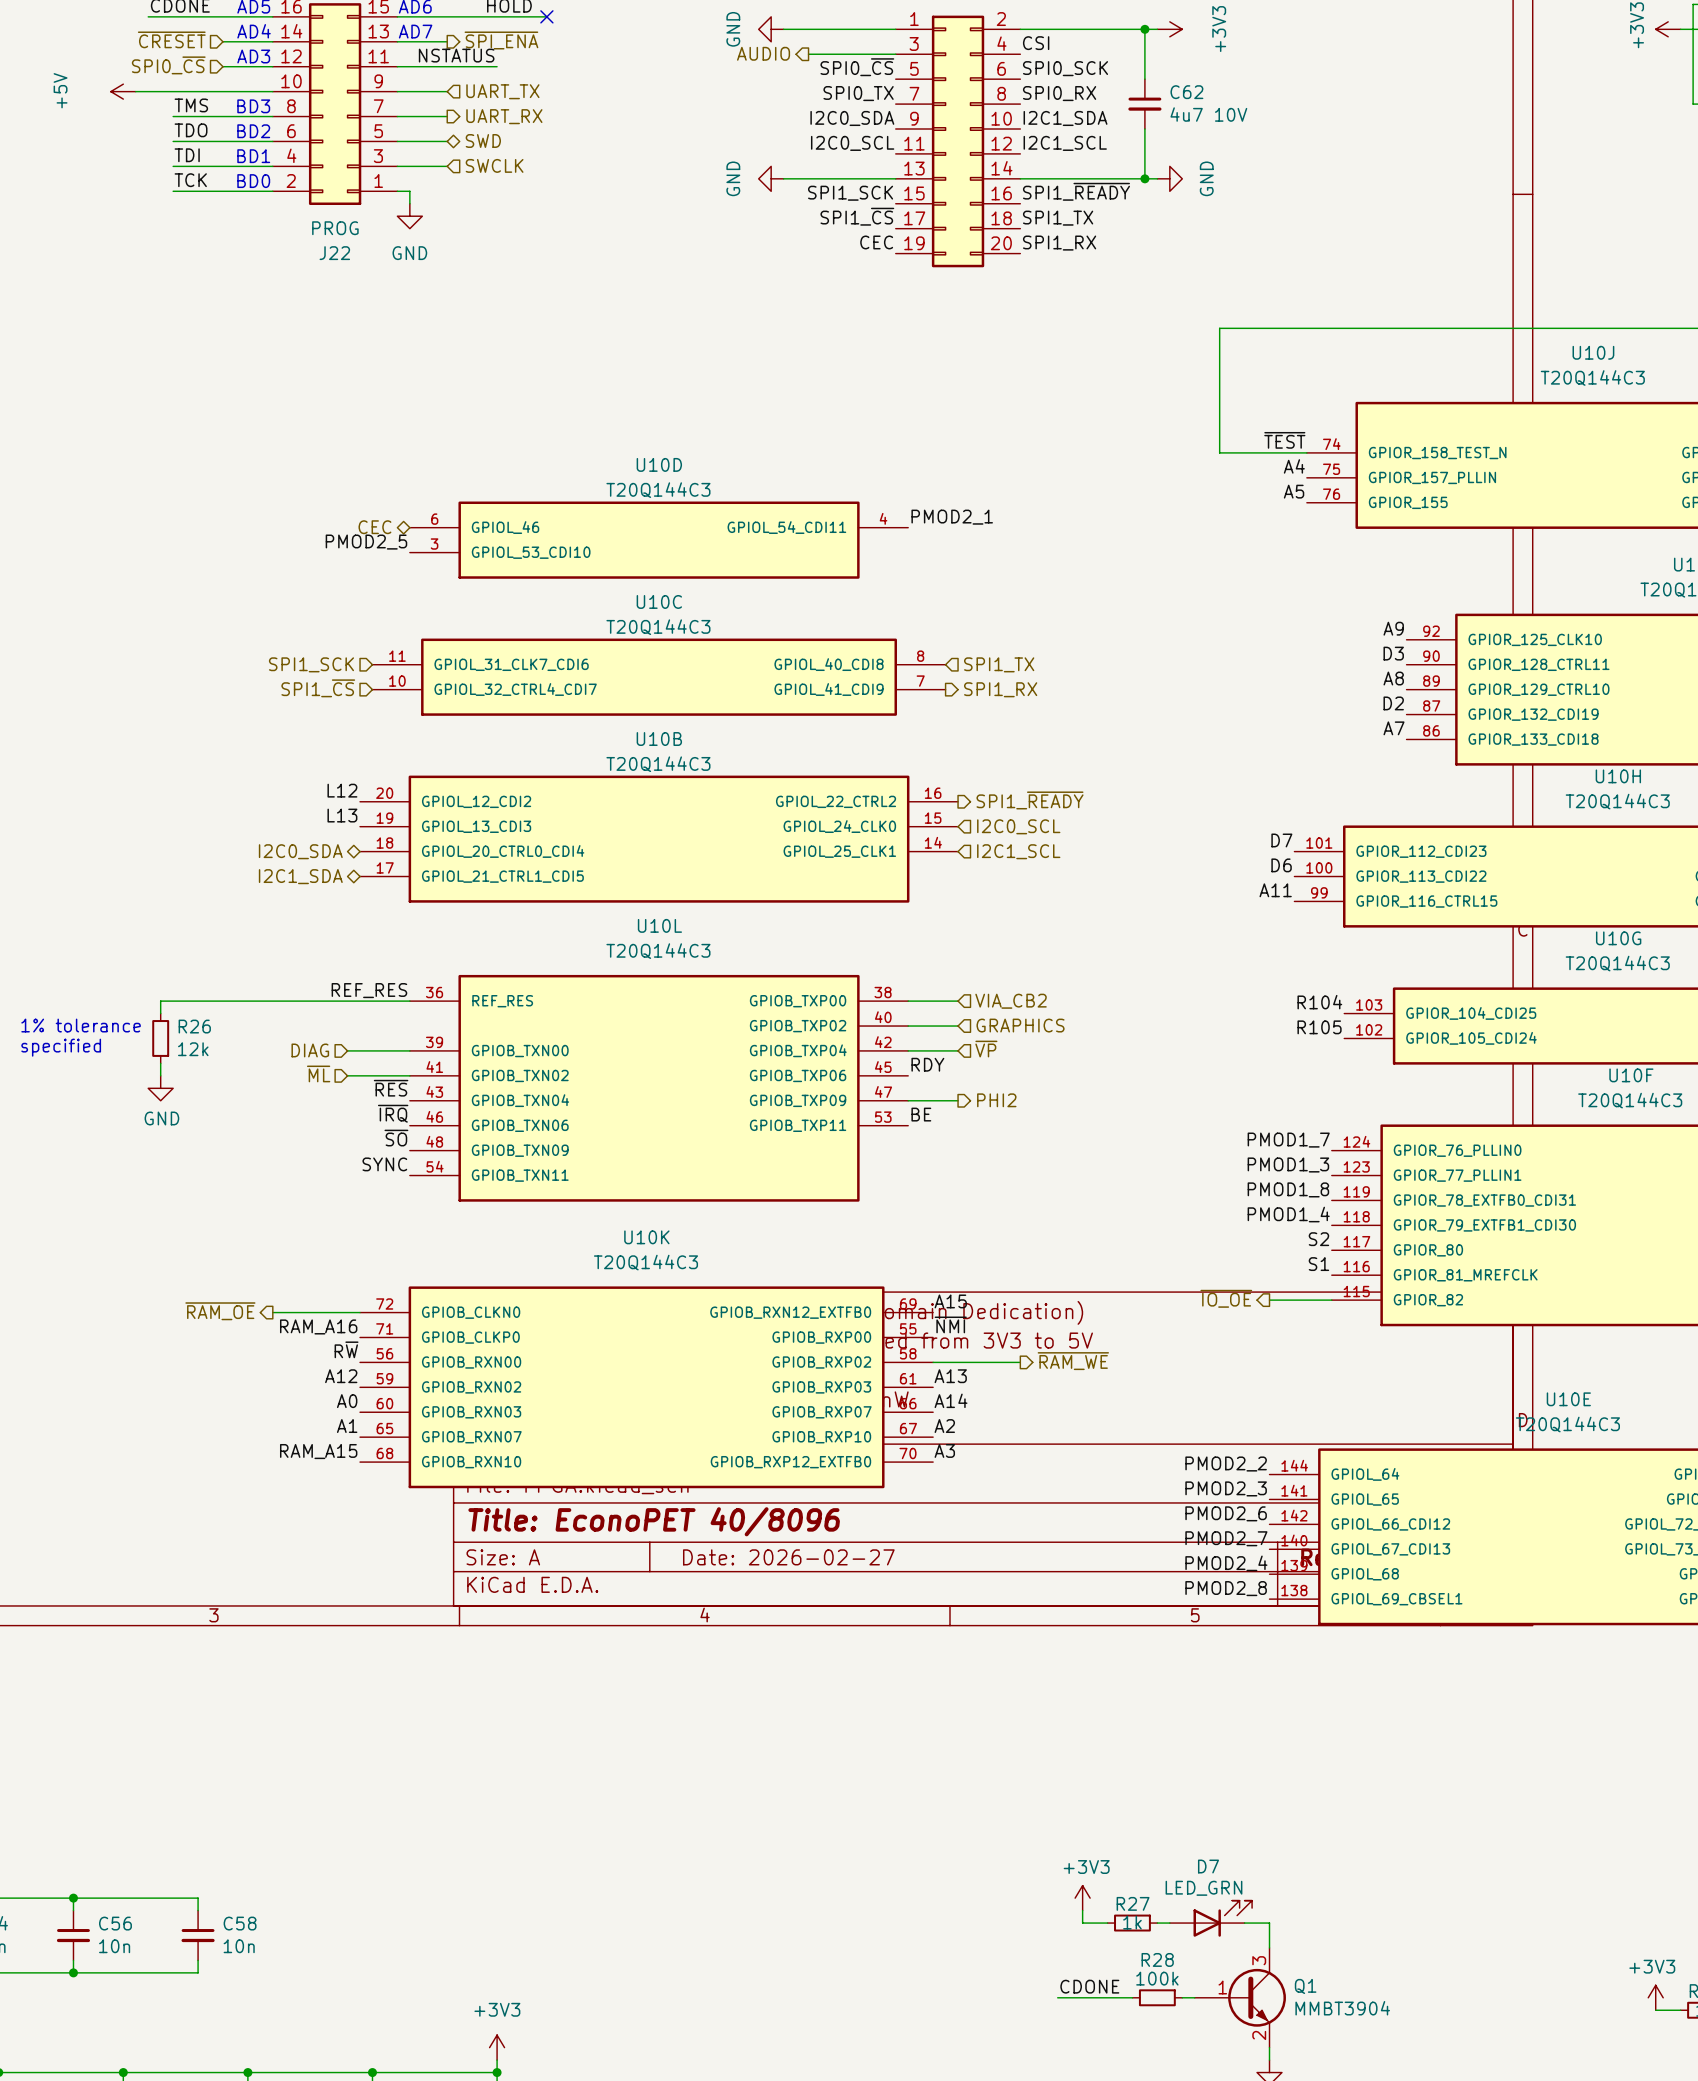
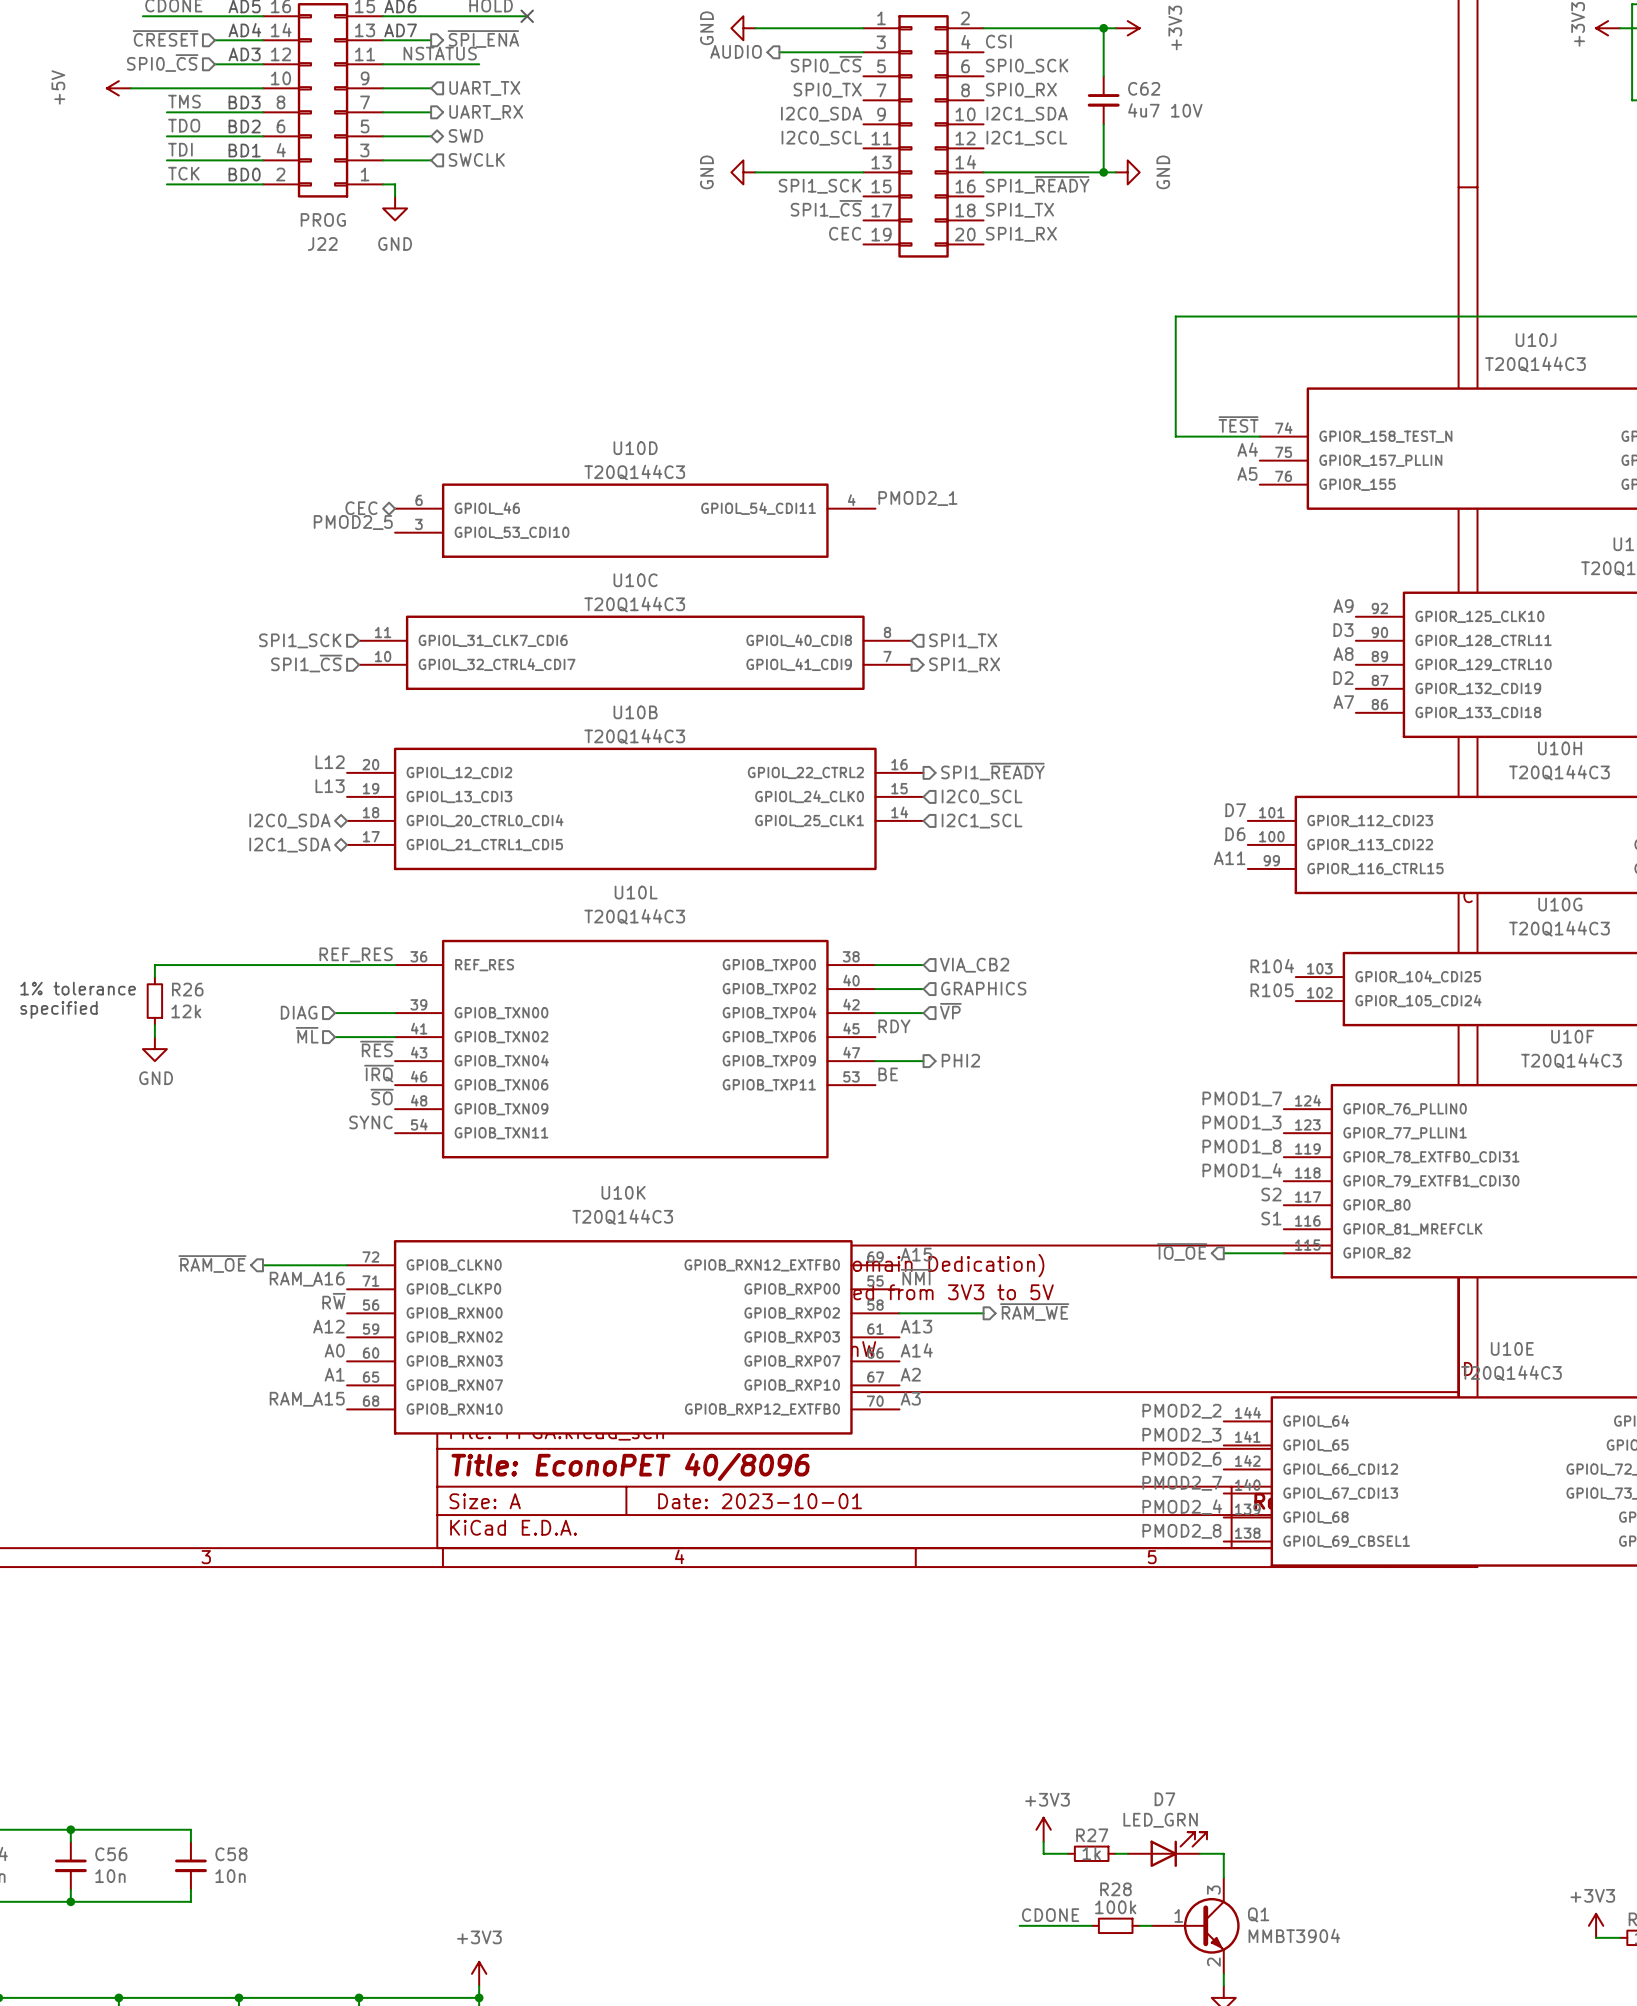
title block: Date: 2026-02-27 (788, 1557) -> Date: 2023-10-01 (760, 1501)

